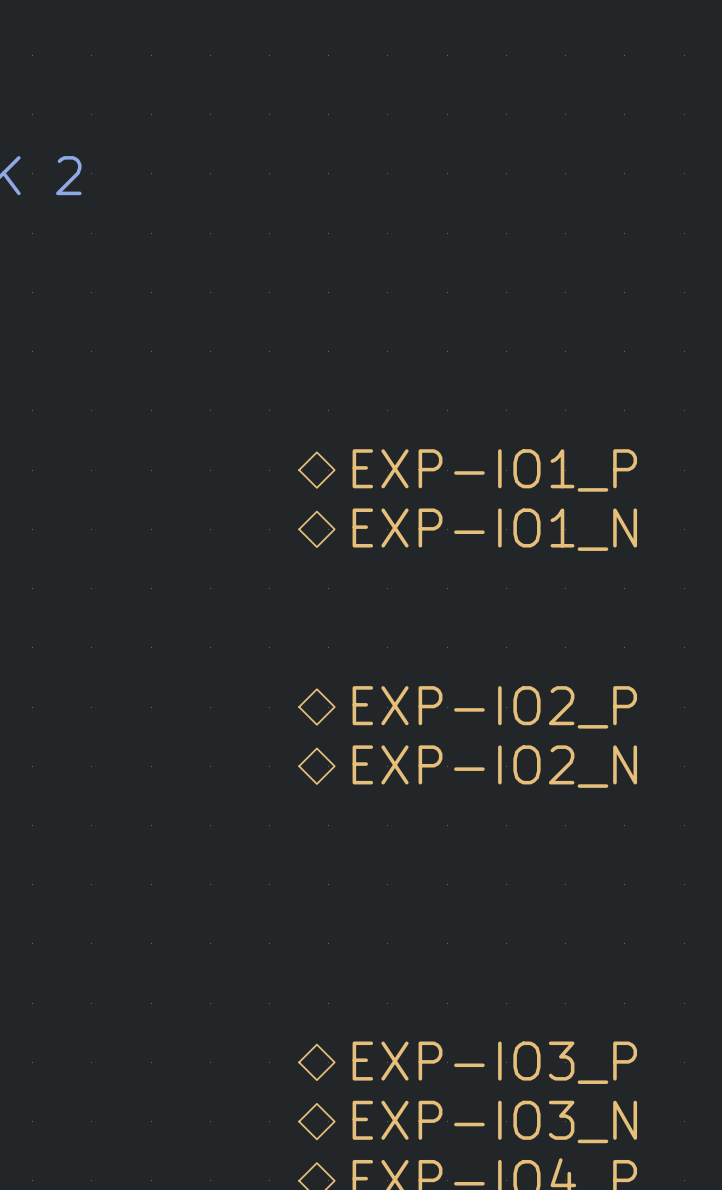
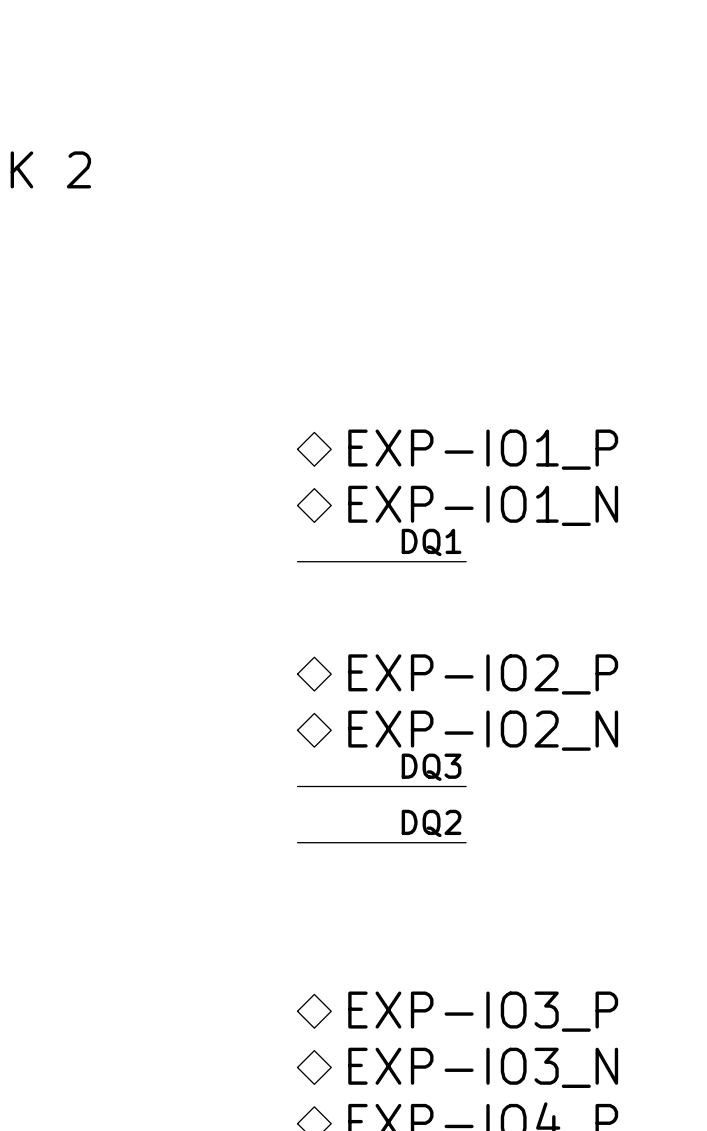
label: none -> DQ1 (431, 542)
wire: none -> (297, 561) (466, 561)
label: none -> DQ3 (431, 767)
wire: none -> (297, 786) (466, 786)
label: none -> DQ2 (431, 823)
wire: none -> (297, 842) (466, 842)

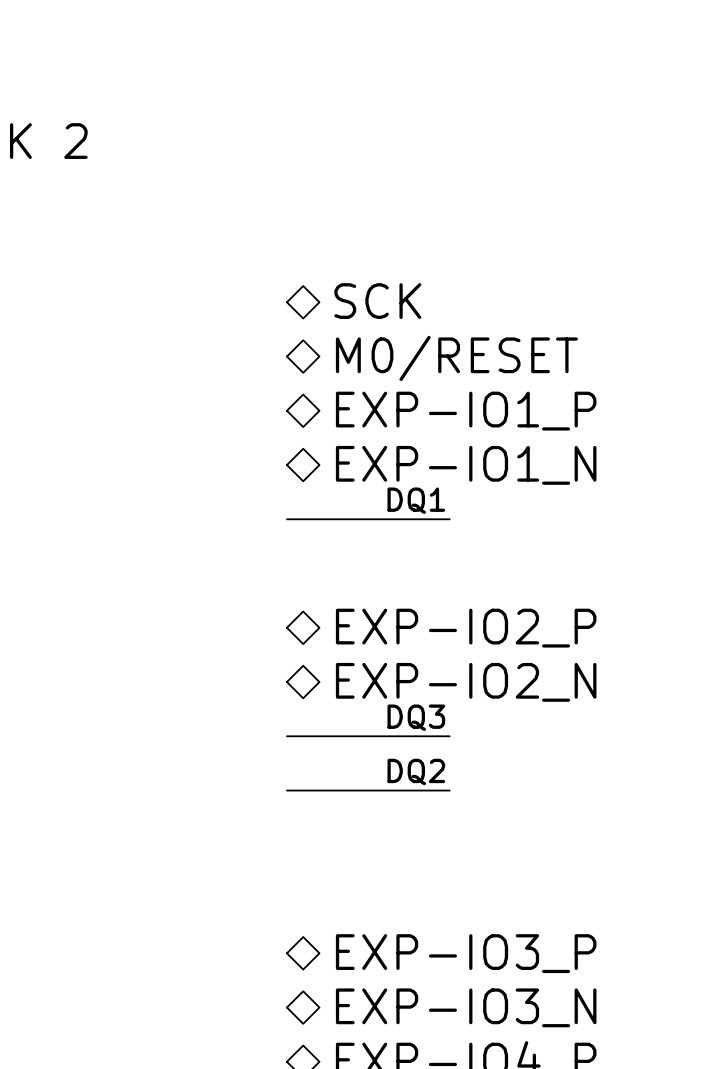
hierarchical label: none -> SCK (377, 301)
hierarchical label: none -> M0/RESET (456, 358)

